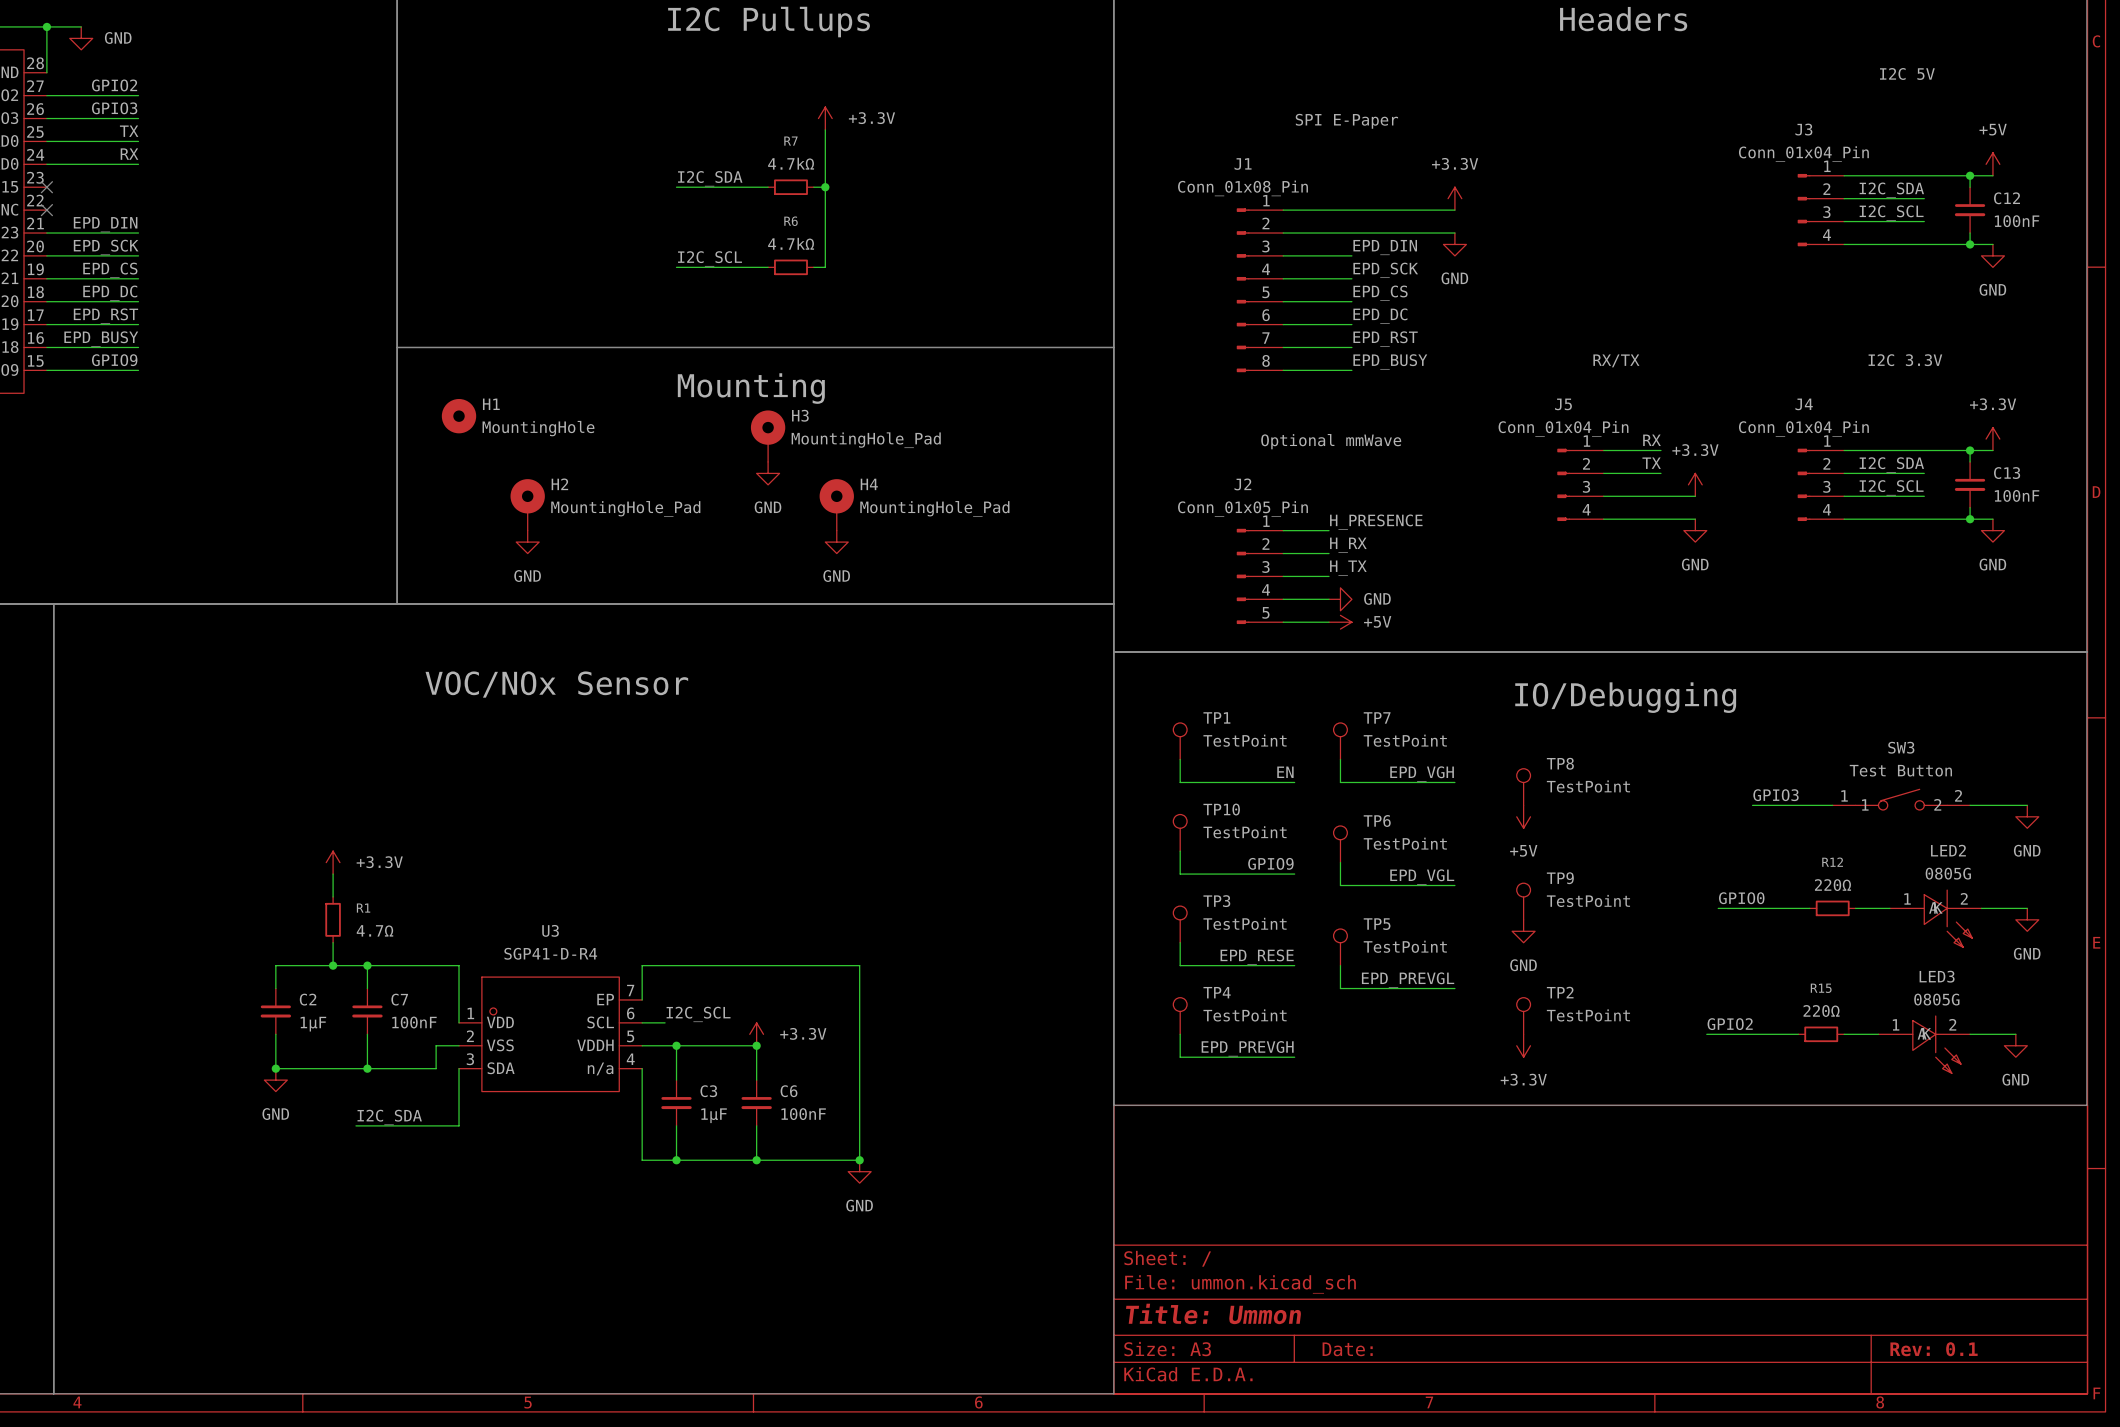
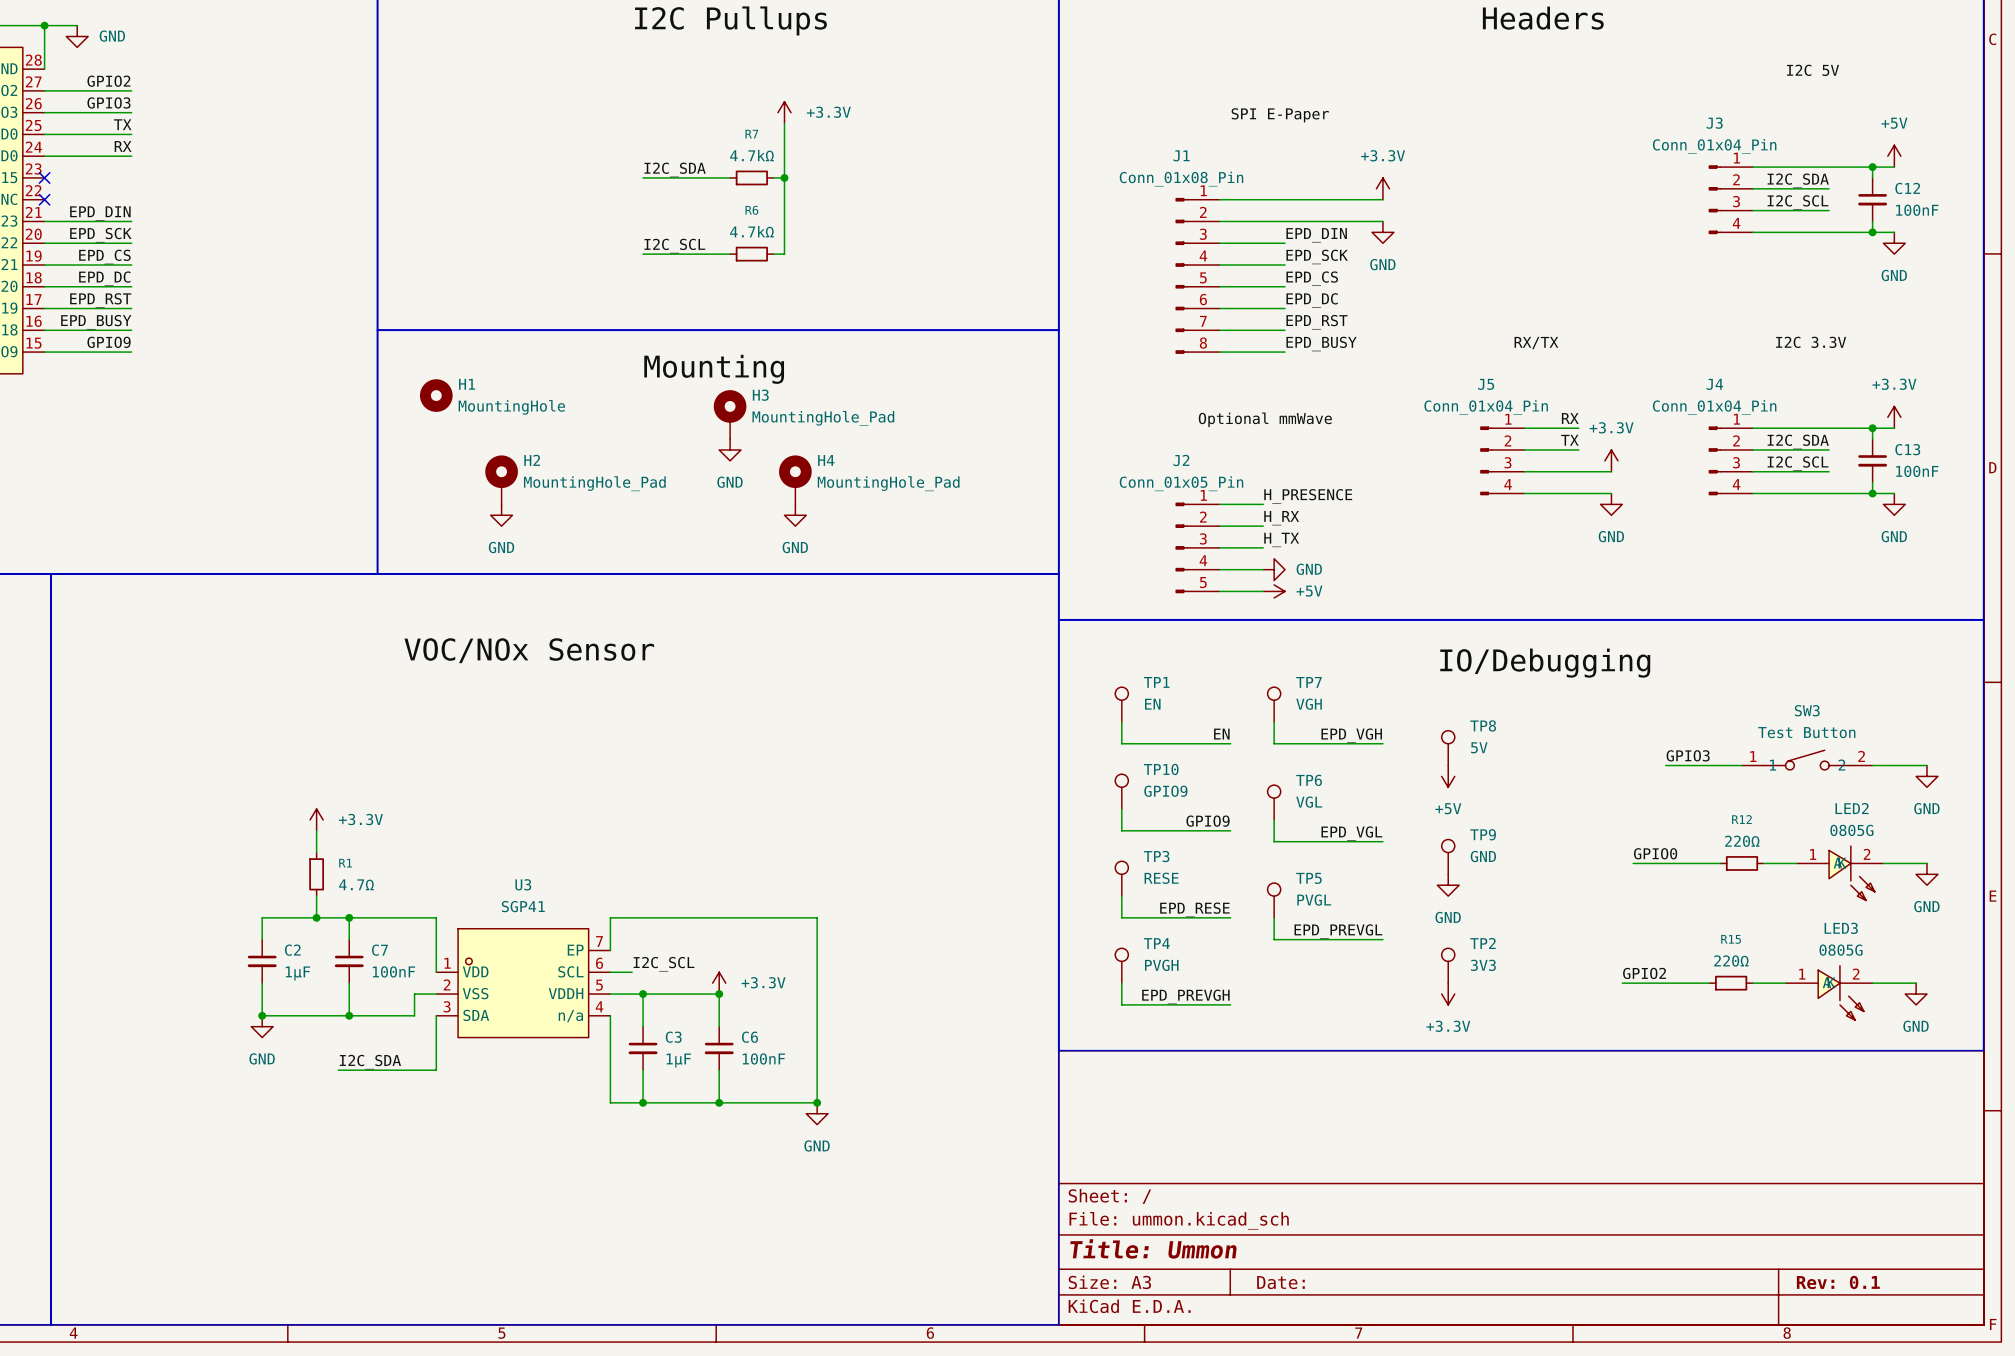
TP1 value: TestPoint (1245, 740) -> EN (1152, 704)
TP7 value: TestPoint (1405, 740) -> VGH (1309, 704)
TP8 value: TestPoint (1588, 786) -> 5V (1479, 747)
TP10 value: TestPoint (1245, 832) -> GPIO9 (1165, 791)
TP6 value: TestPoint (1405, 843) -> VGL (1309, 802)
TP9 value: TestPoint (1588, 900) -> GND (1483, 856)
TP3 value: TestPoint (1245, 923) -> RESE (1161, 878)
TP5 value: TestPoint (1405, 946) -> PVGL (1314, 900)
U3 value: SGP41-D-R4 (550, 953) -> SGP41 (523, 906)
TP4 value: TestPoint (1245, 1015) -> PVGH (1161, 965)
TP2 value: TestPoint (1588, 1015) -> 3V3 (1483, 965)

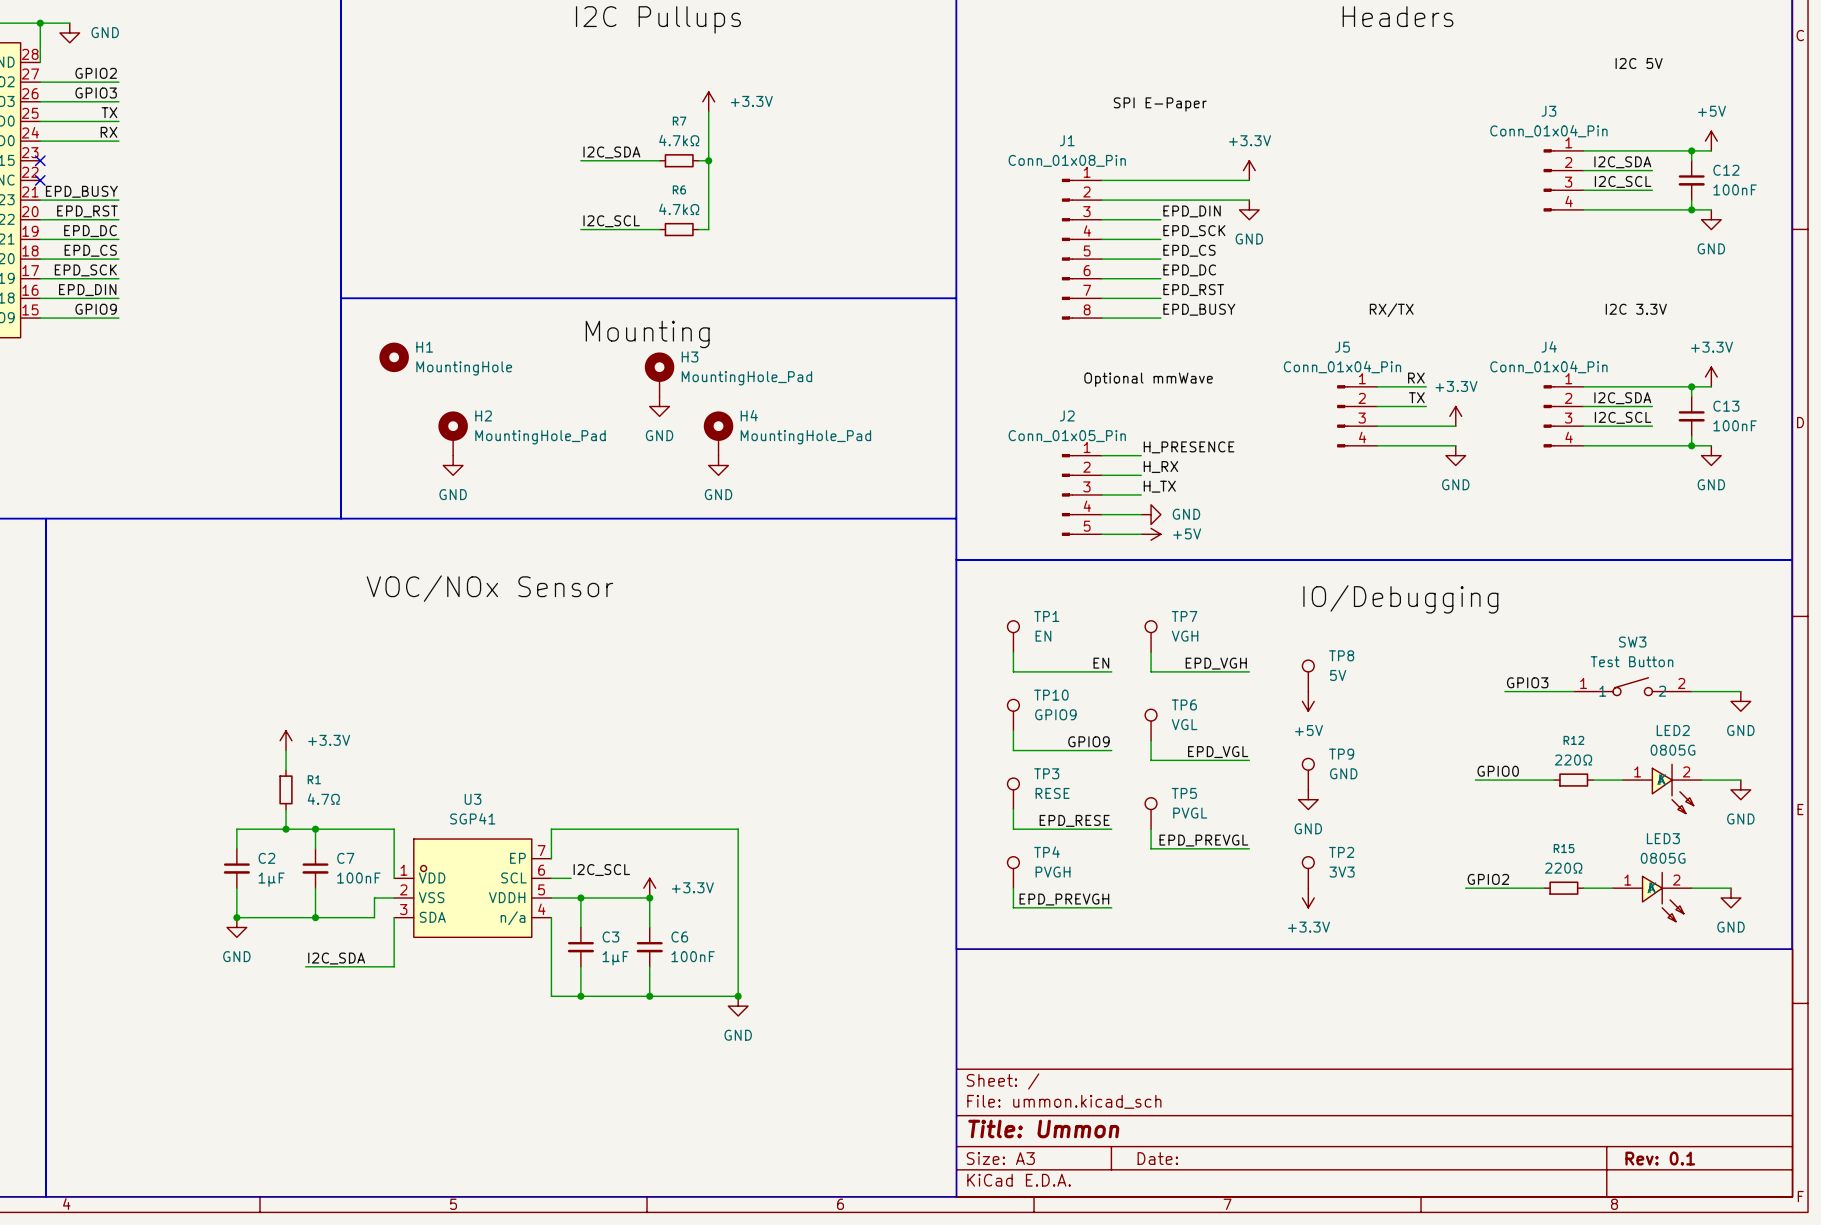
label: EPD_DIN (100, 213) -> EPD_BUSY (81, 191)
label: EPD_SCK (100, 235) -> EPD_RST (87, 211)
label: EPD_CS (104, 256) -> EPD_DC (90, 231)
label: EPD_DC (104, 278) -> EPD_CS (90, 250)
label: EPD_RST (100, 300) -> EPD_SCK (85, 270)
label: EPD_BUSY (96, 322) -> EPD_DIN (87, 290)

